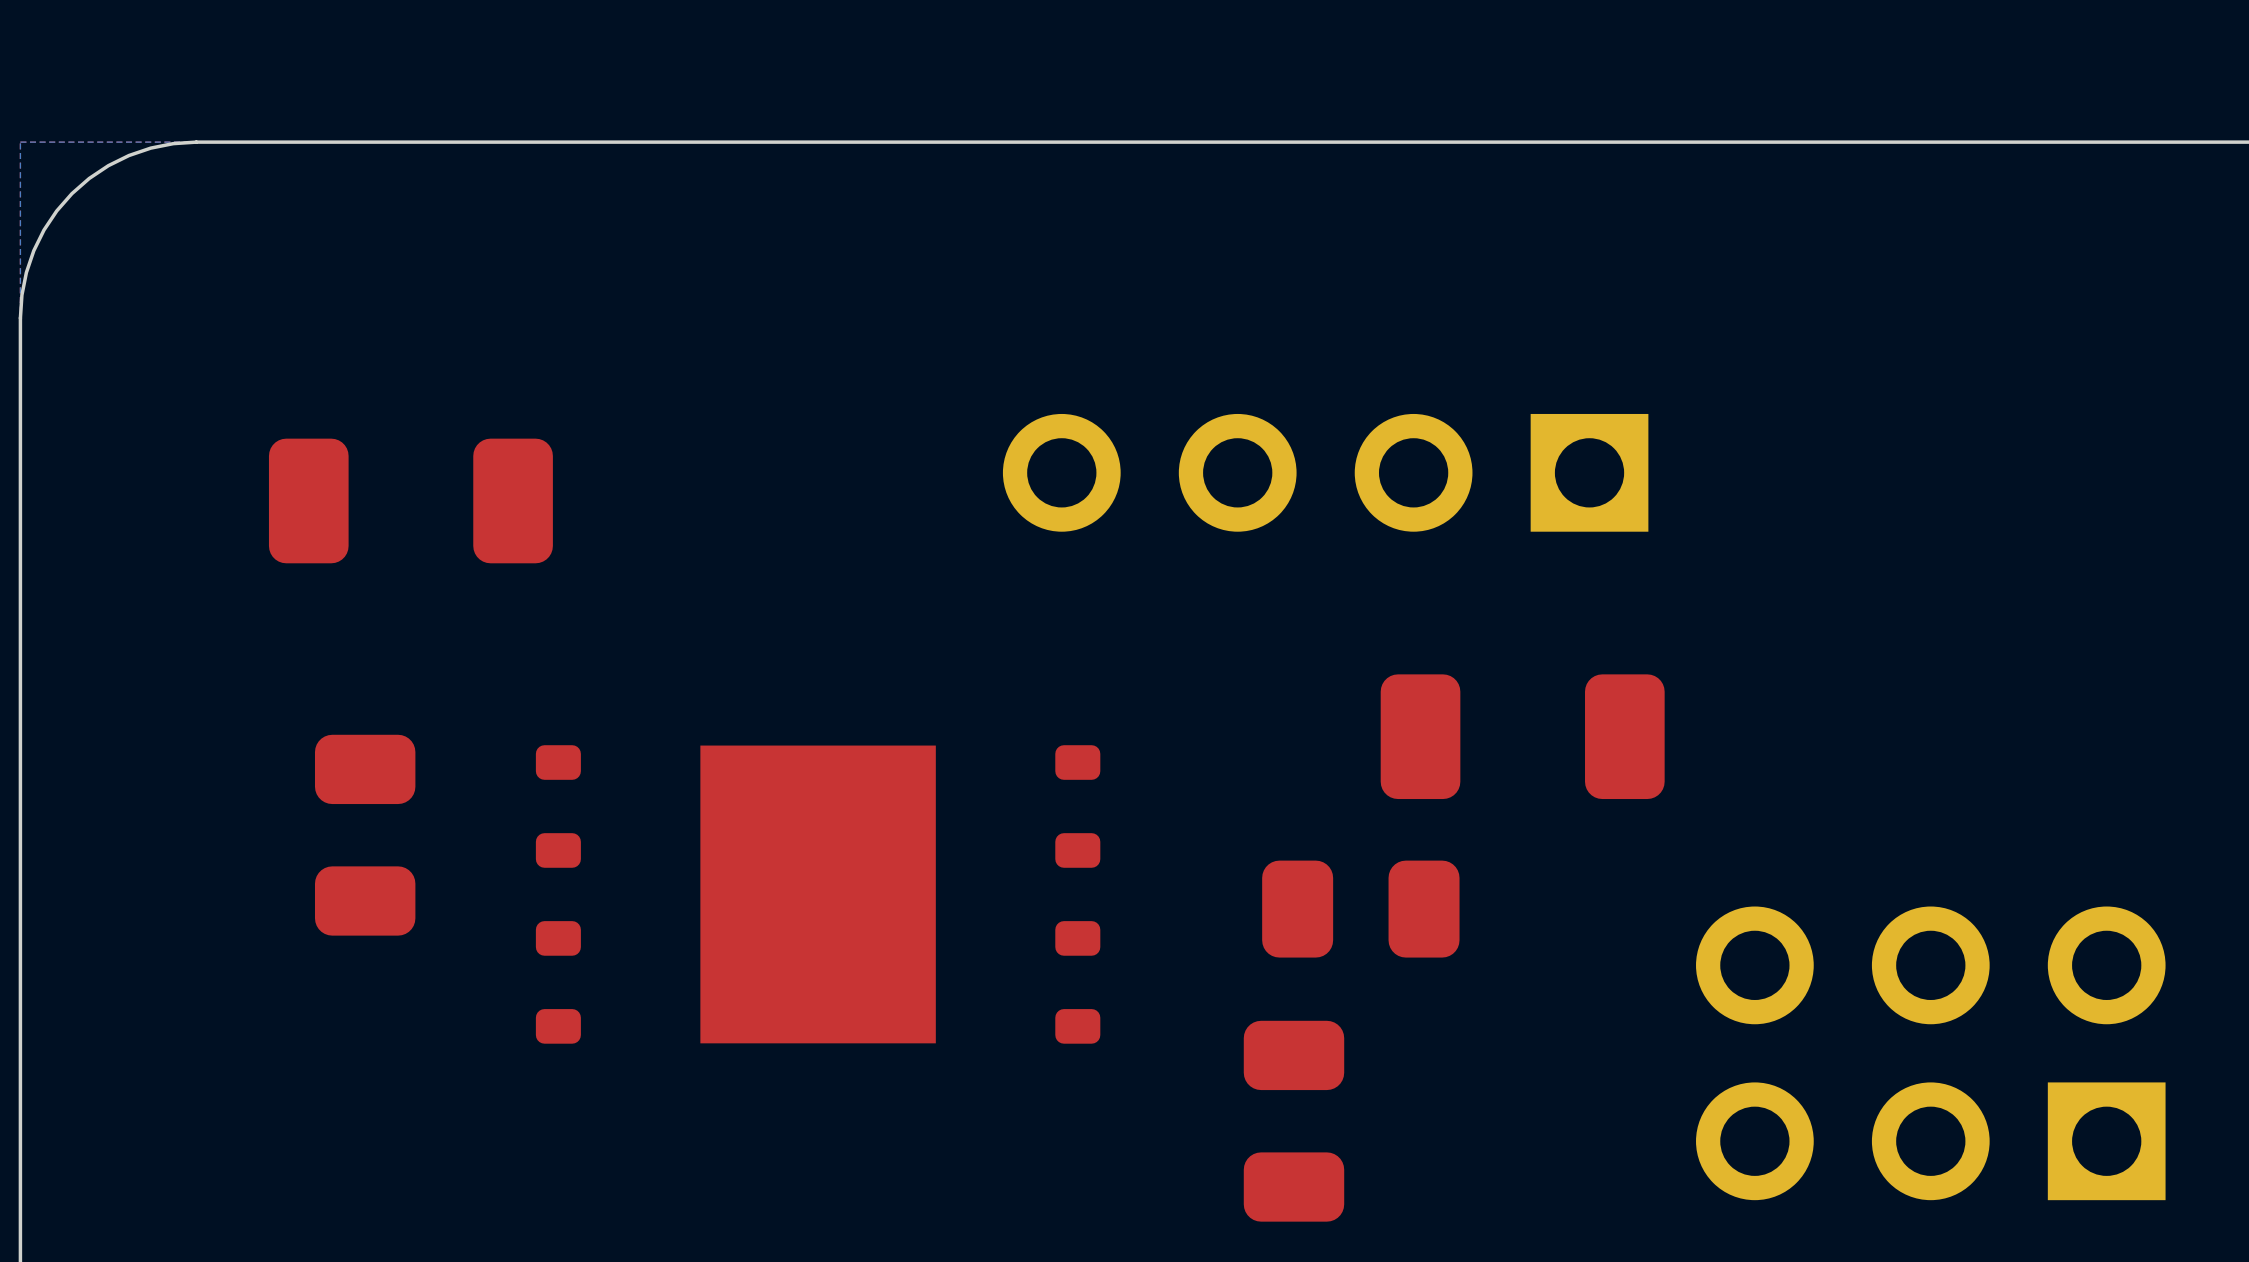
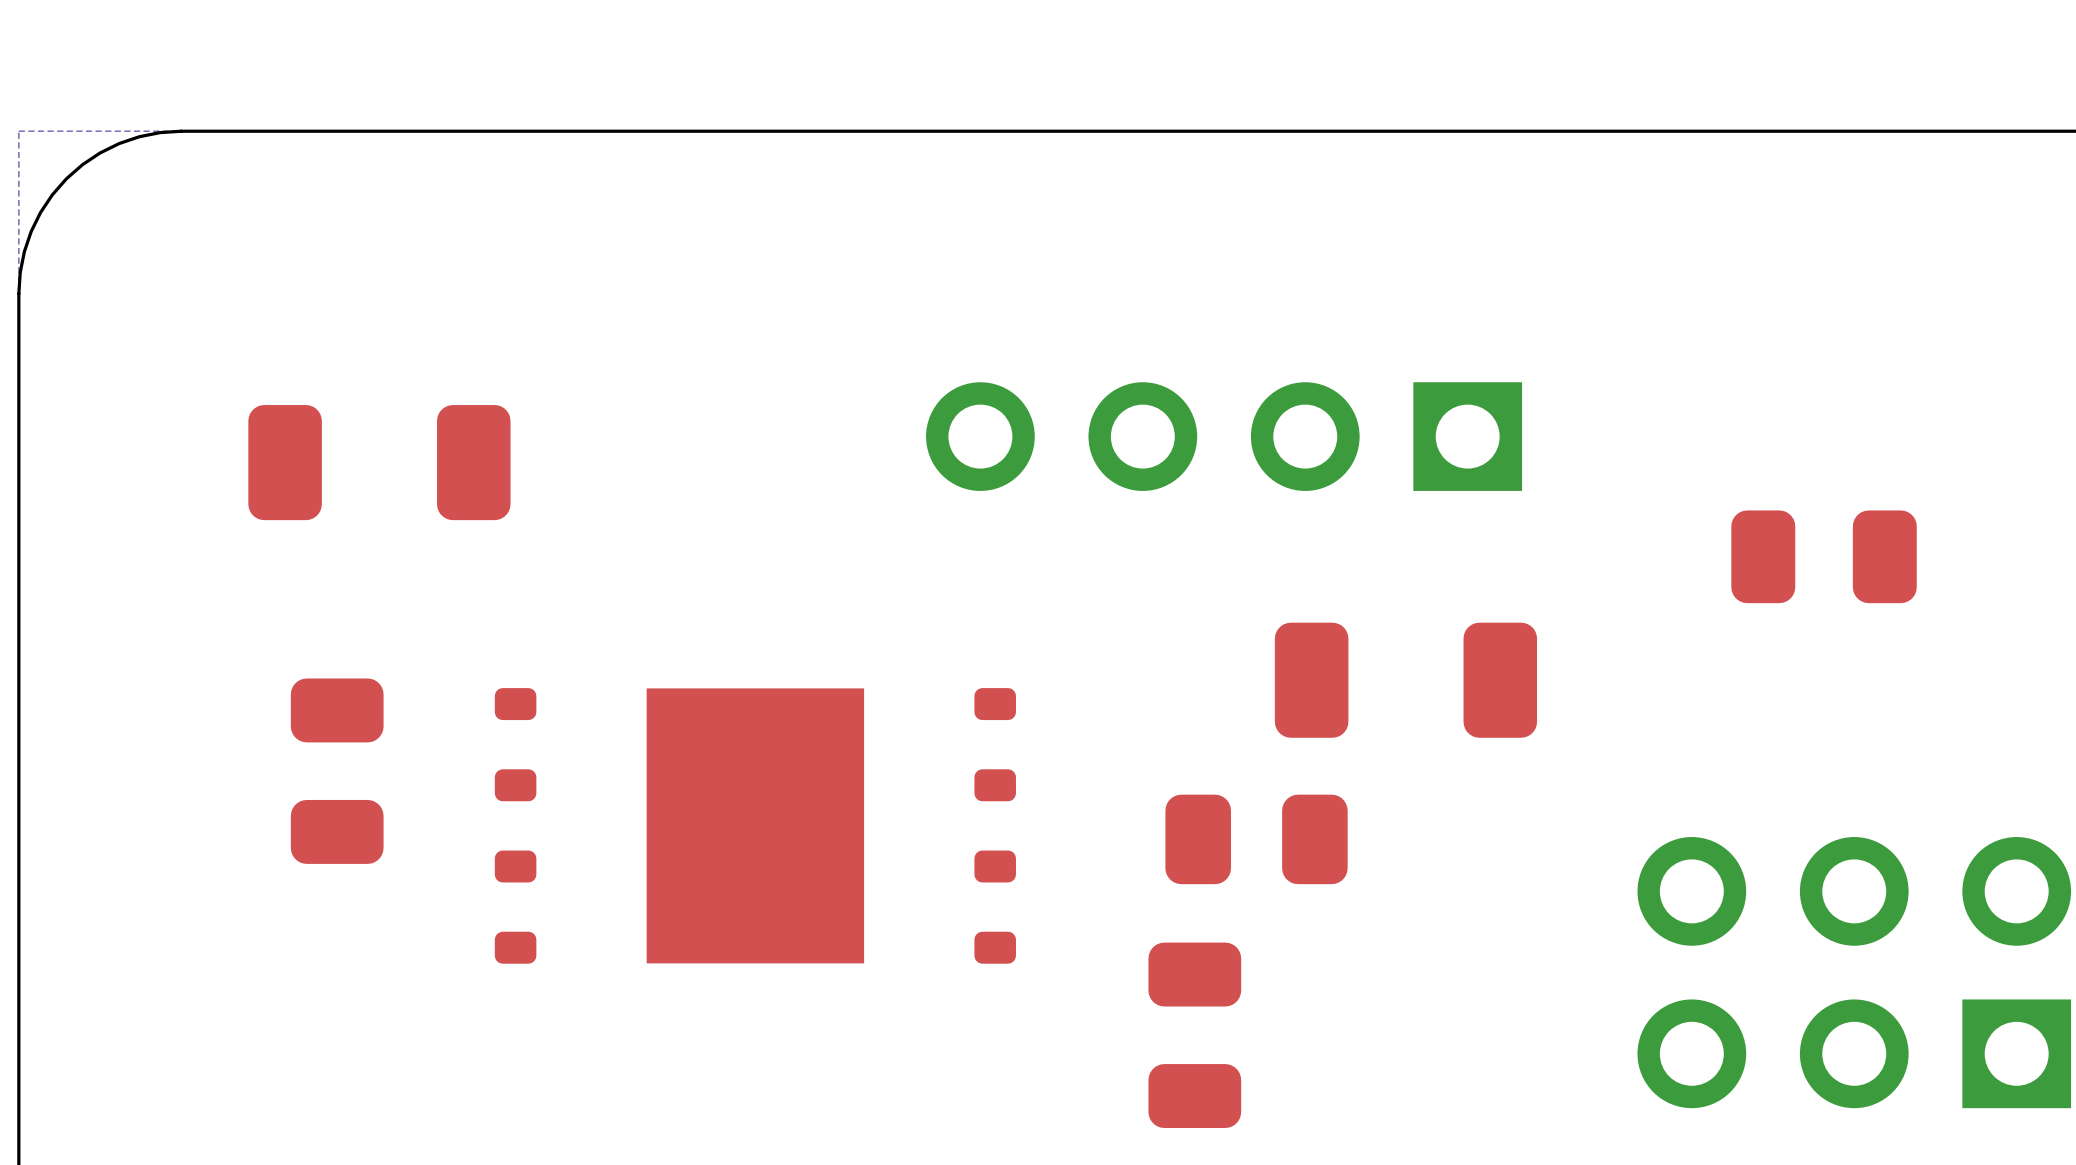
part: none -> (1824, 556)
part position: (1930, 1053) -> (1854, 972)

